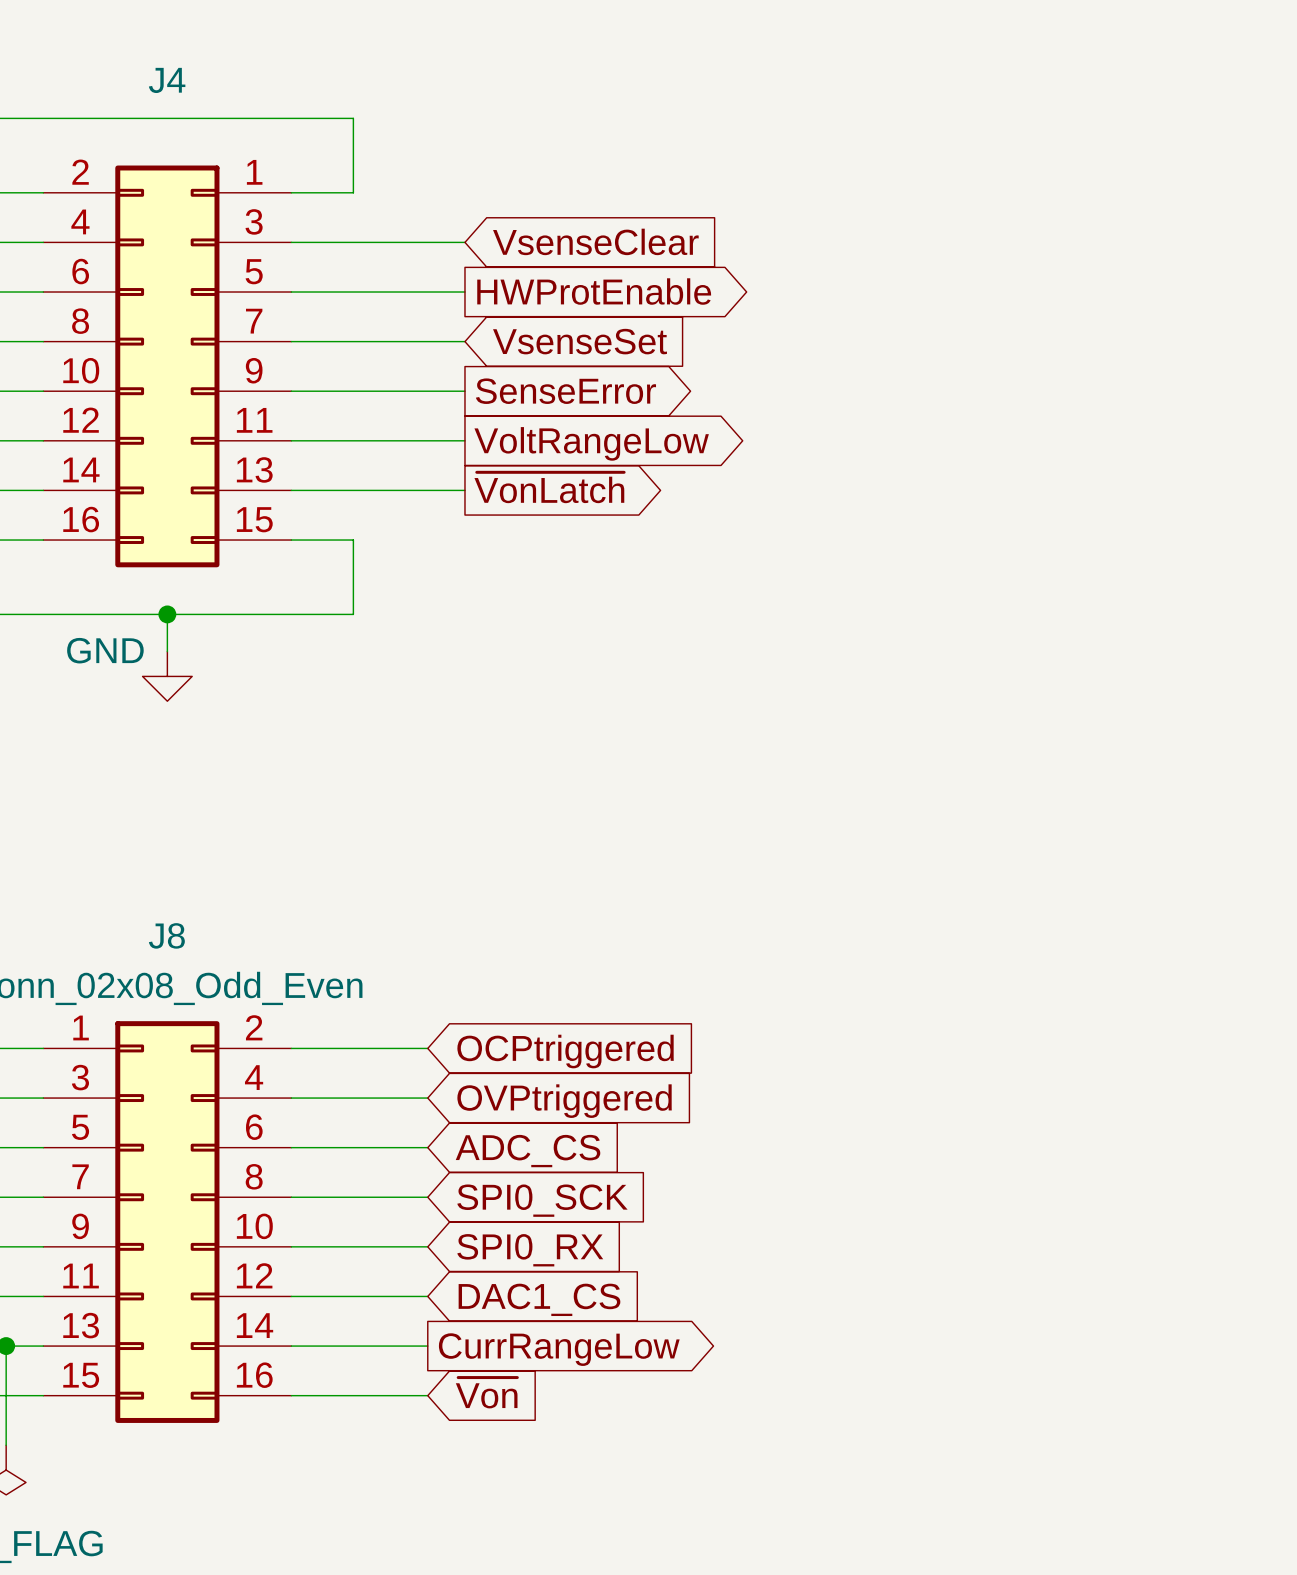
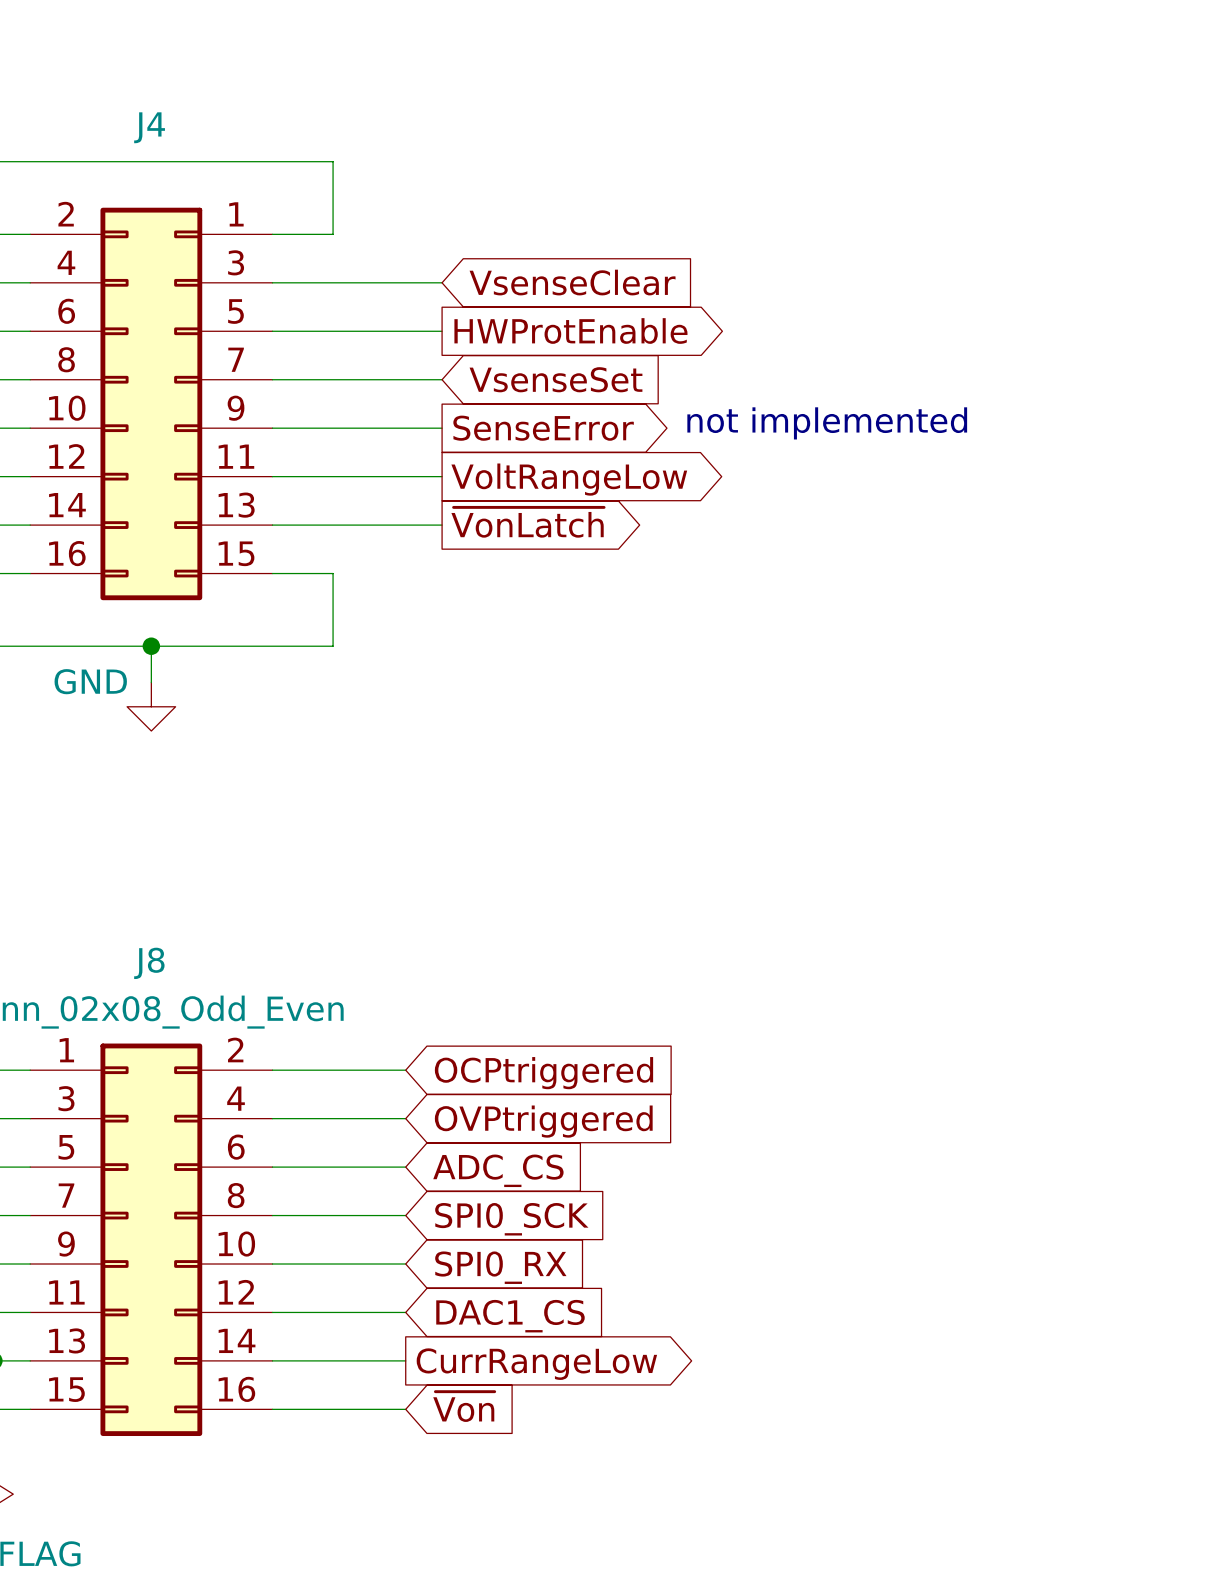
text: none -> not implemented (827, 423)

